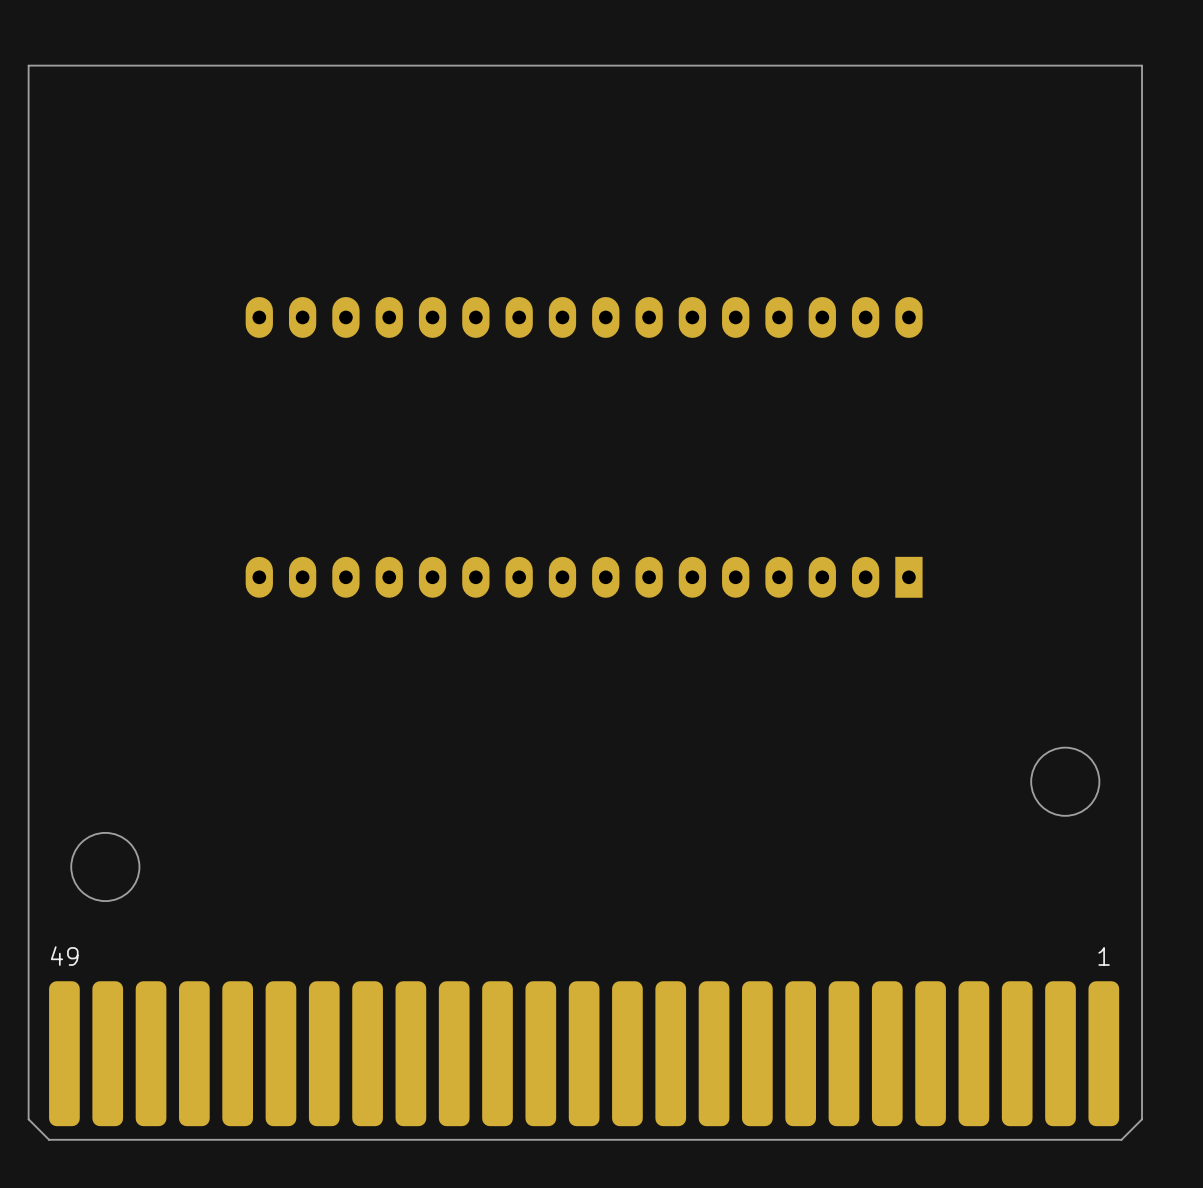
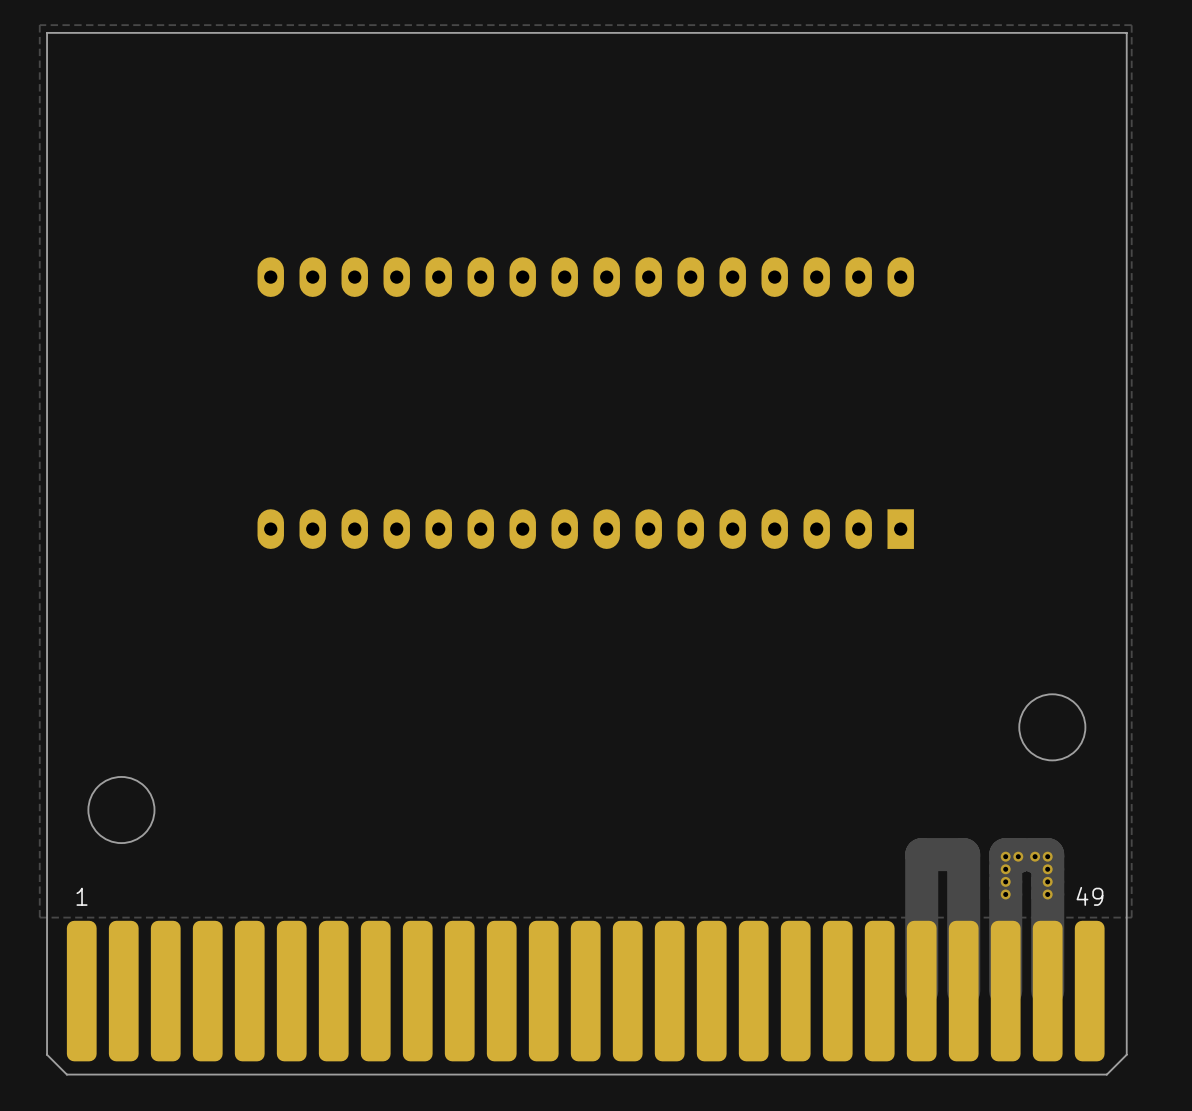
zone outline: none -> (1131, 25) (1131, 917) (39, 917) (39, 25) (1131, 25)
via: none -> (1005, 856)
via: none -> (1018, 856)
via: none -> (1035, 856)
via: none -> (1047, 856)
via: none -> (1005, 869)
via: none -> (1047, 869)
via: none -> (1005, 881)
via: none -> (1047, 881)
via: none -> (1005, 894)
via: none -> (1047, 894)
part text position: 49 (64, 956) -> 49 (1089, 896)
part text position: 1 (1104, 956) -> 1 (82, 896)
track: none -> (963, 991) (963, 854) (921, 854) (921, 991)
track: none -> (1047, 991) (1047, 854) (1037, 854) (1035, 856) (1033, 854) (1020, 854) (1018, 856) (1016, 854) (1005, 854) (1005, 991)

